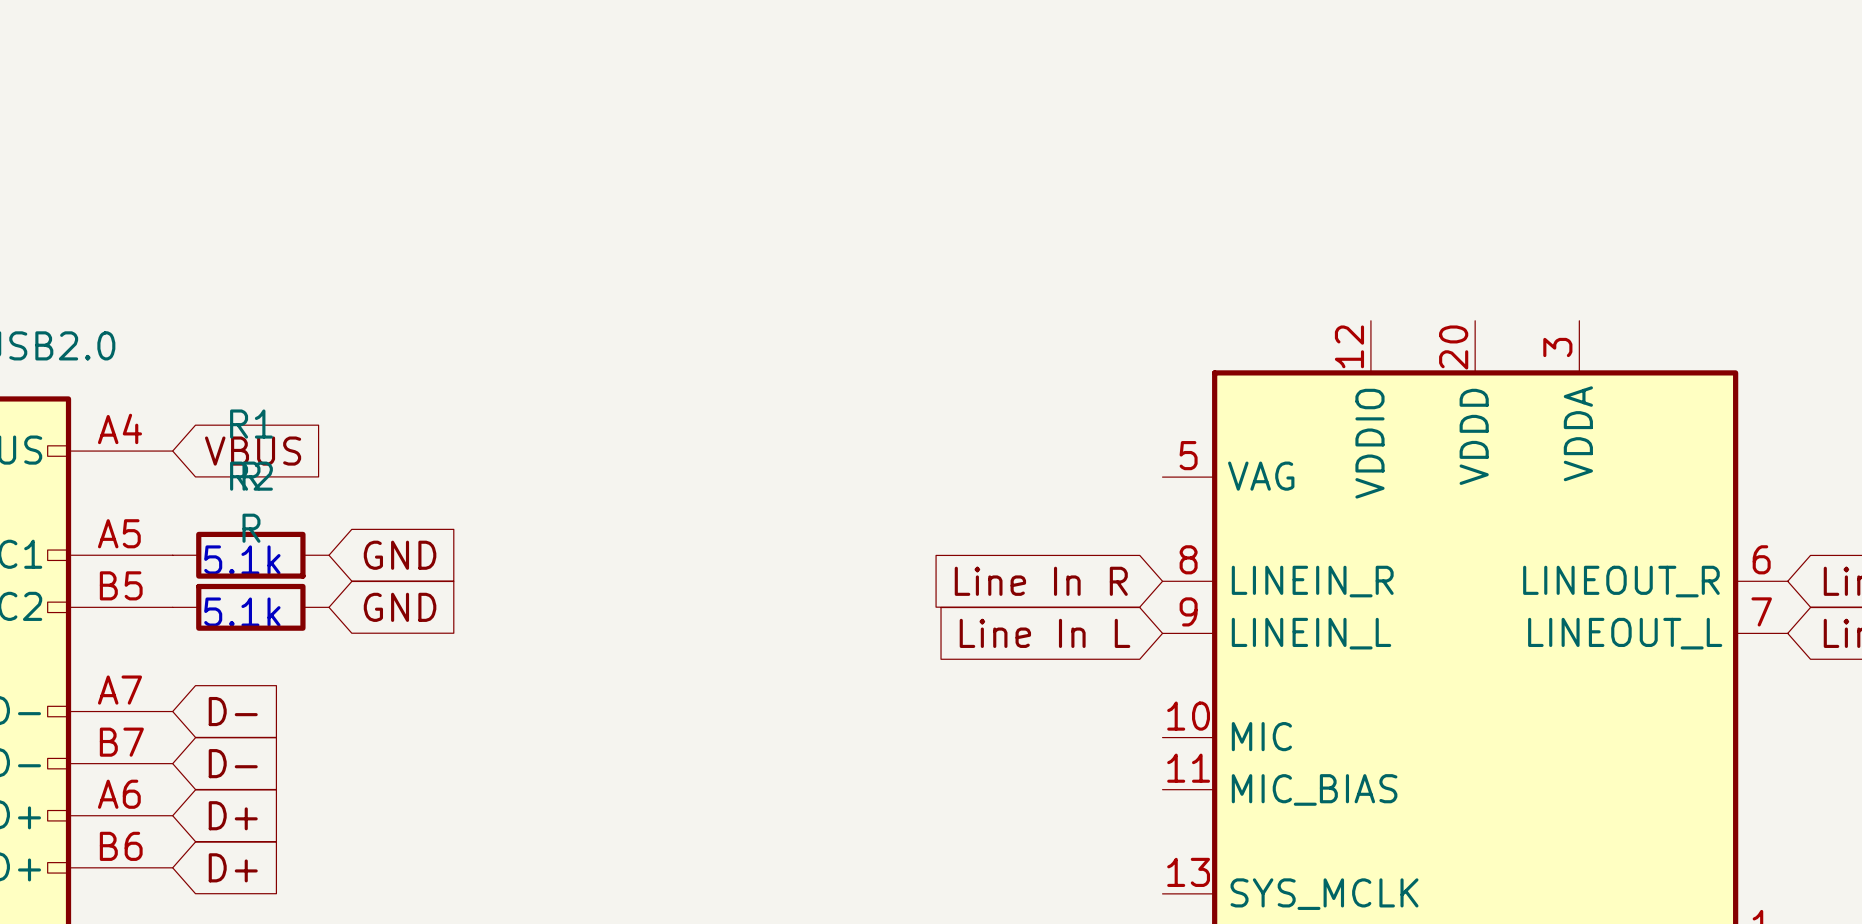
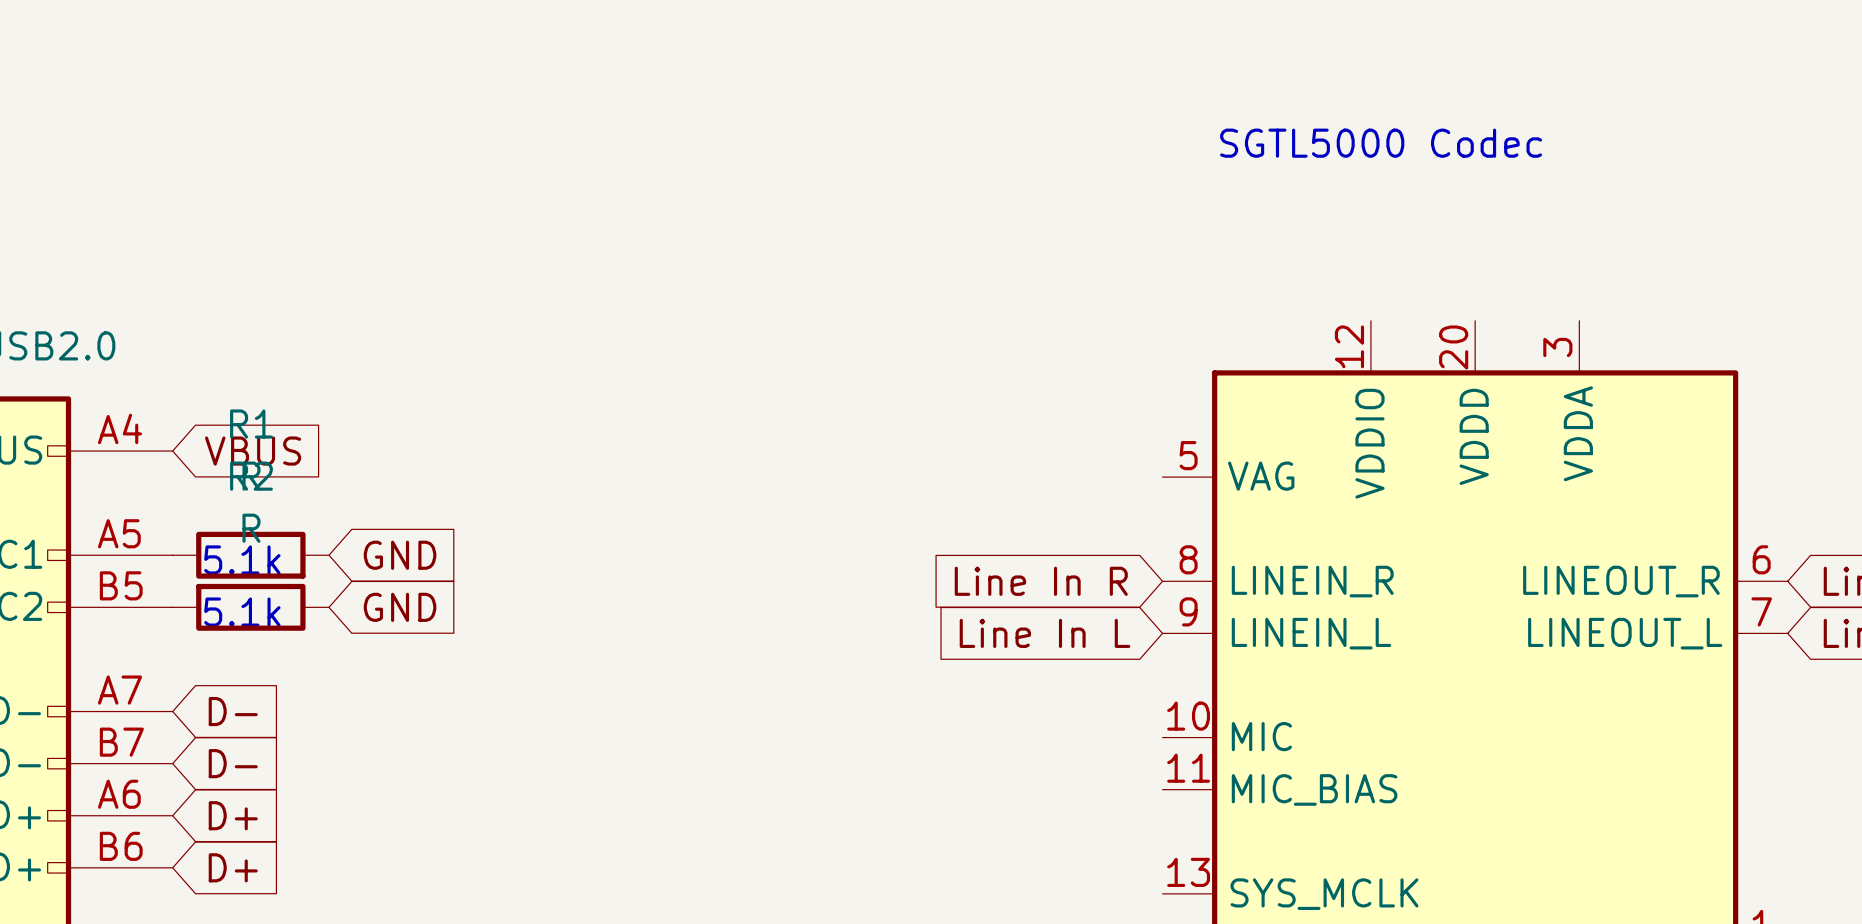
text: none -> SGTL5000 Codec (1381, 143)

